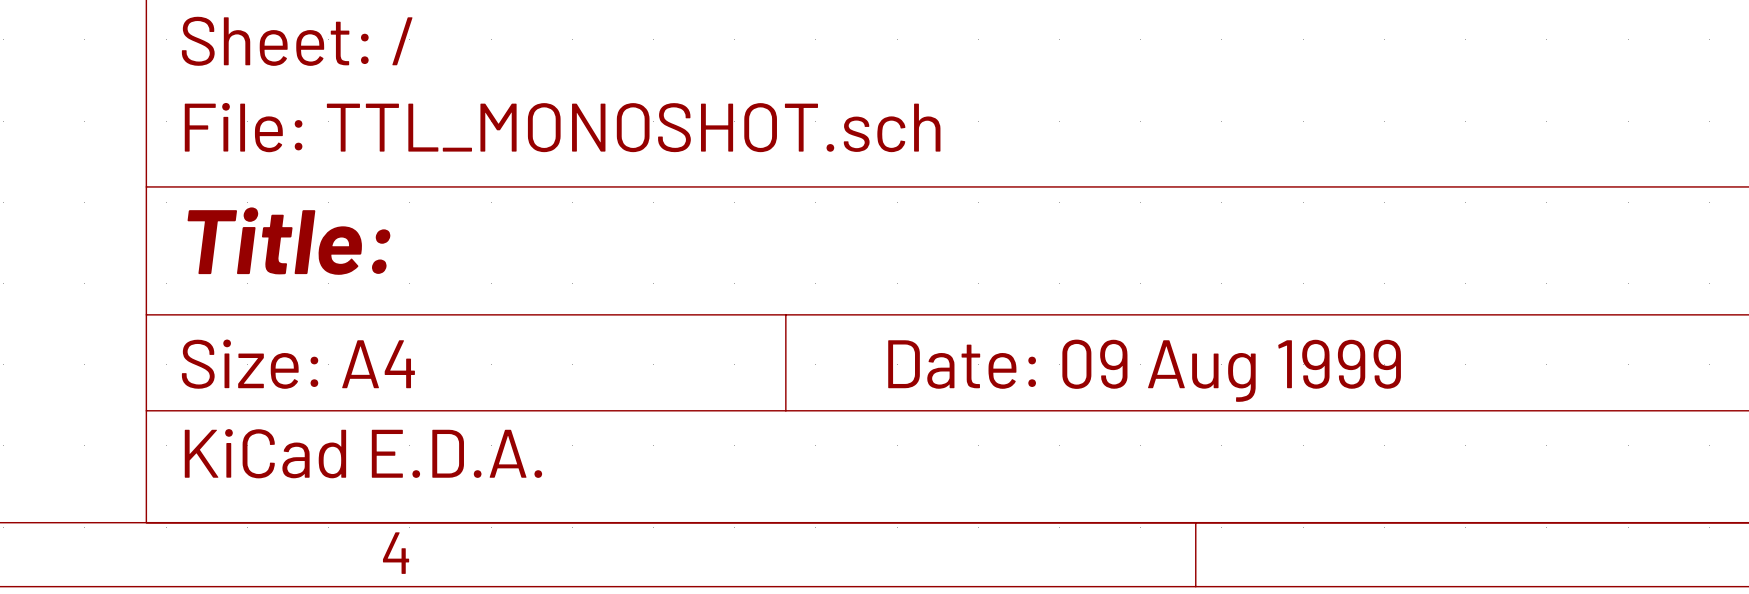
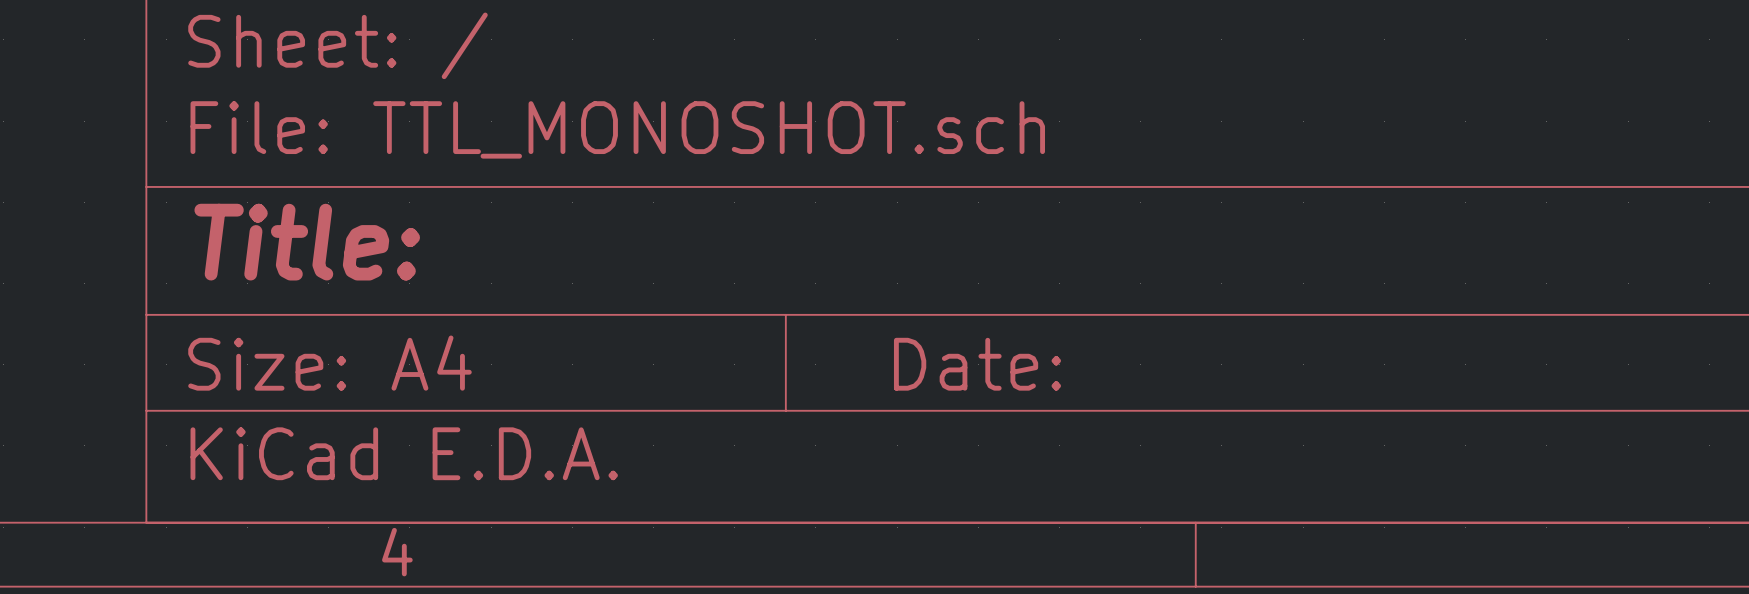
title block: Date: 09 Aug 1999 (1144, 370) -> Date: (977, 364)

